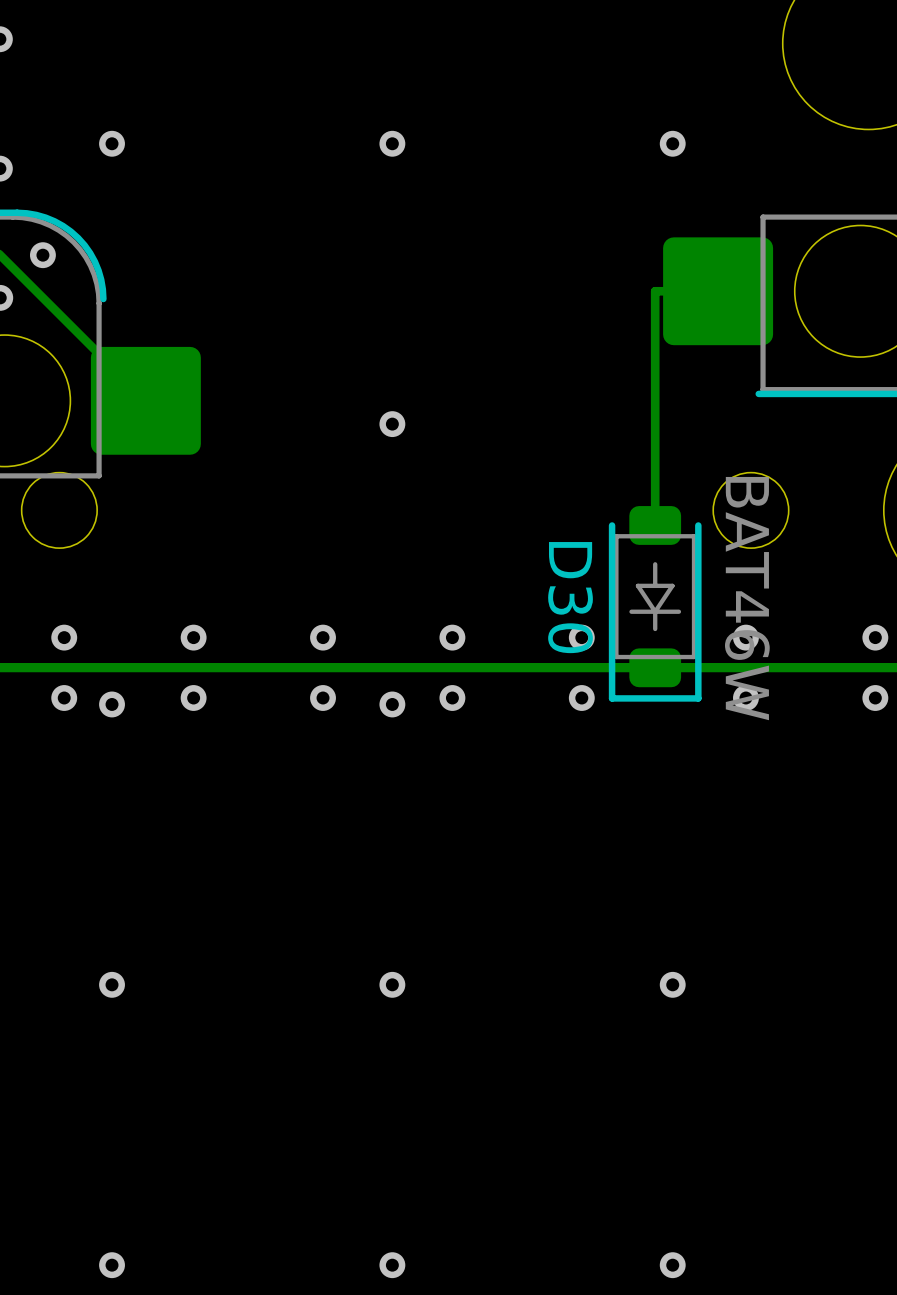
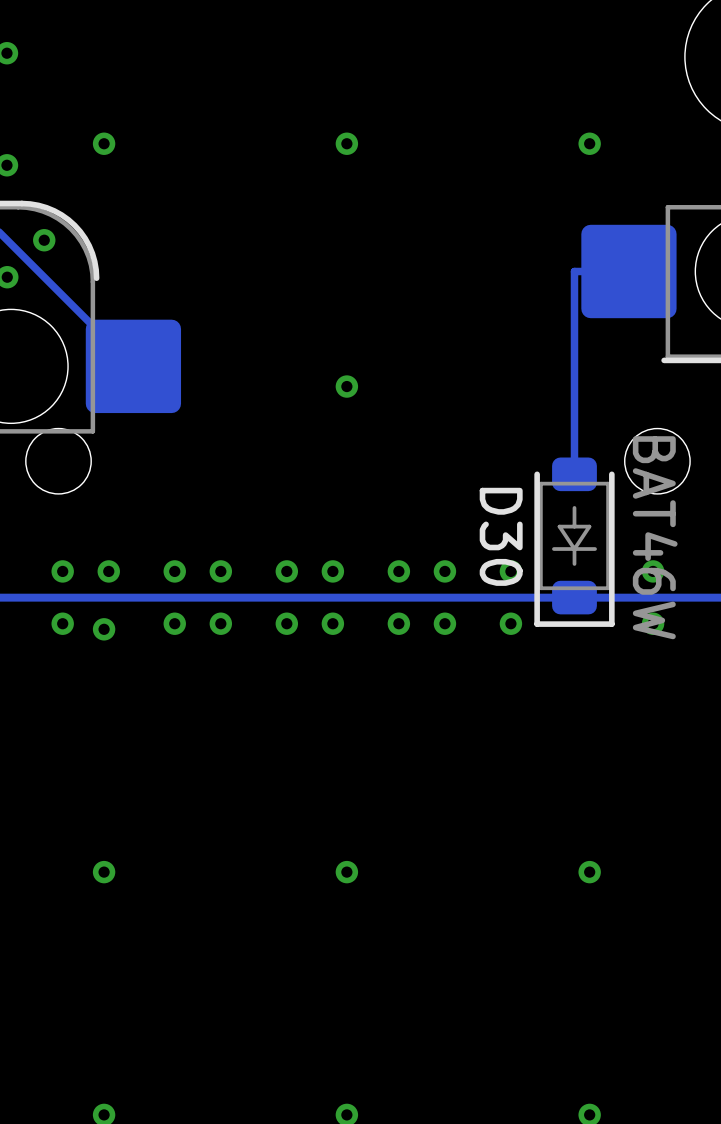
via: none -> (108, 571)
via: none -> (220, 571)
via: none -> (332, 571)
via: none -> (444, 571)
via: none -> (220, 623)
via: none -> (444, 623)
via position: (392, 704) -> (332, 623)

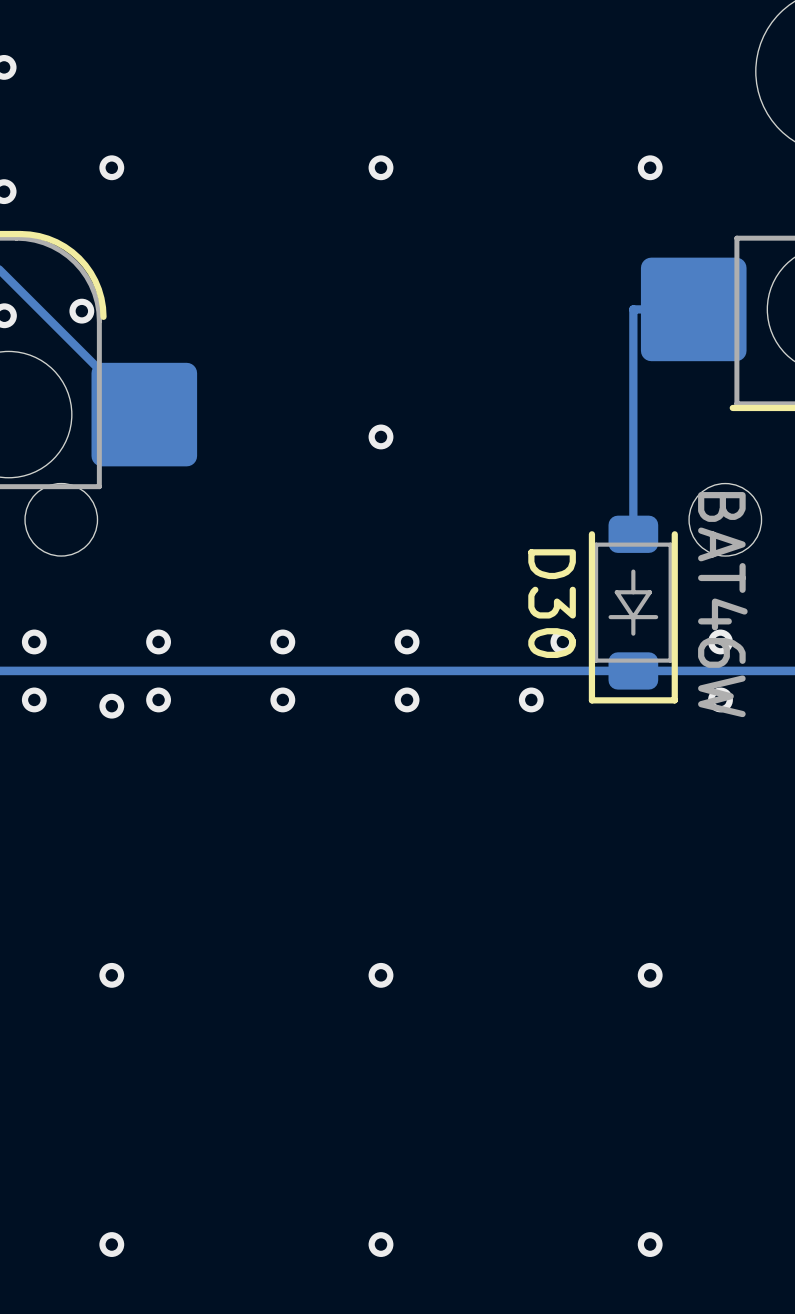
via position: (44, 240) -> (81, 311)
via position: (62, 571) -> (34, 641)
via: (108, 571) -> none
via: none -> (158, 641)
via: (174, 571) -> none
via: (220, 571) -> none
via: none -> (282, 641)
via: (286, 571) -> none
via: (332, 571) -> none
via: none -> (407, 641)
via: (398, 571) -> none
via: (444, 571) -> none
via position: (62, 623) -> (34, 699)
via position: (174, 623) -> (158, 699)
via: (220, 623) -> none
via: none -> (282, 699)
via: (286, 623) -> none
via: (332, 623) -> none
via: none -> (407, 699)
via: (398, 623) -> none
via: (444, 623) -> none
via: none -> (531, 699)
via: (510, 623) -> none

